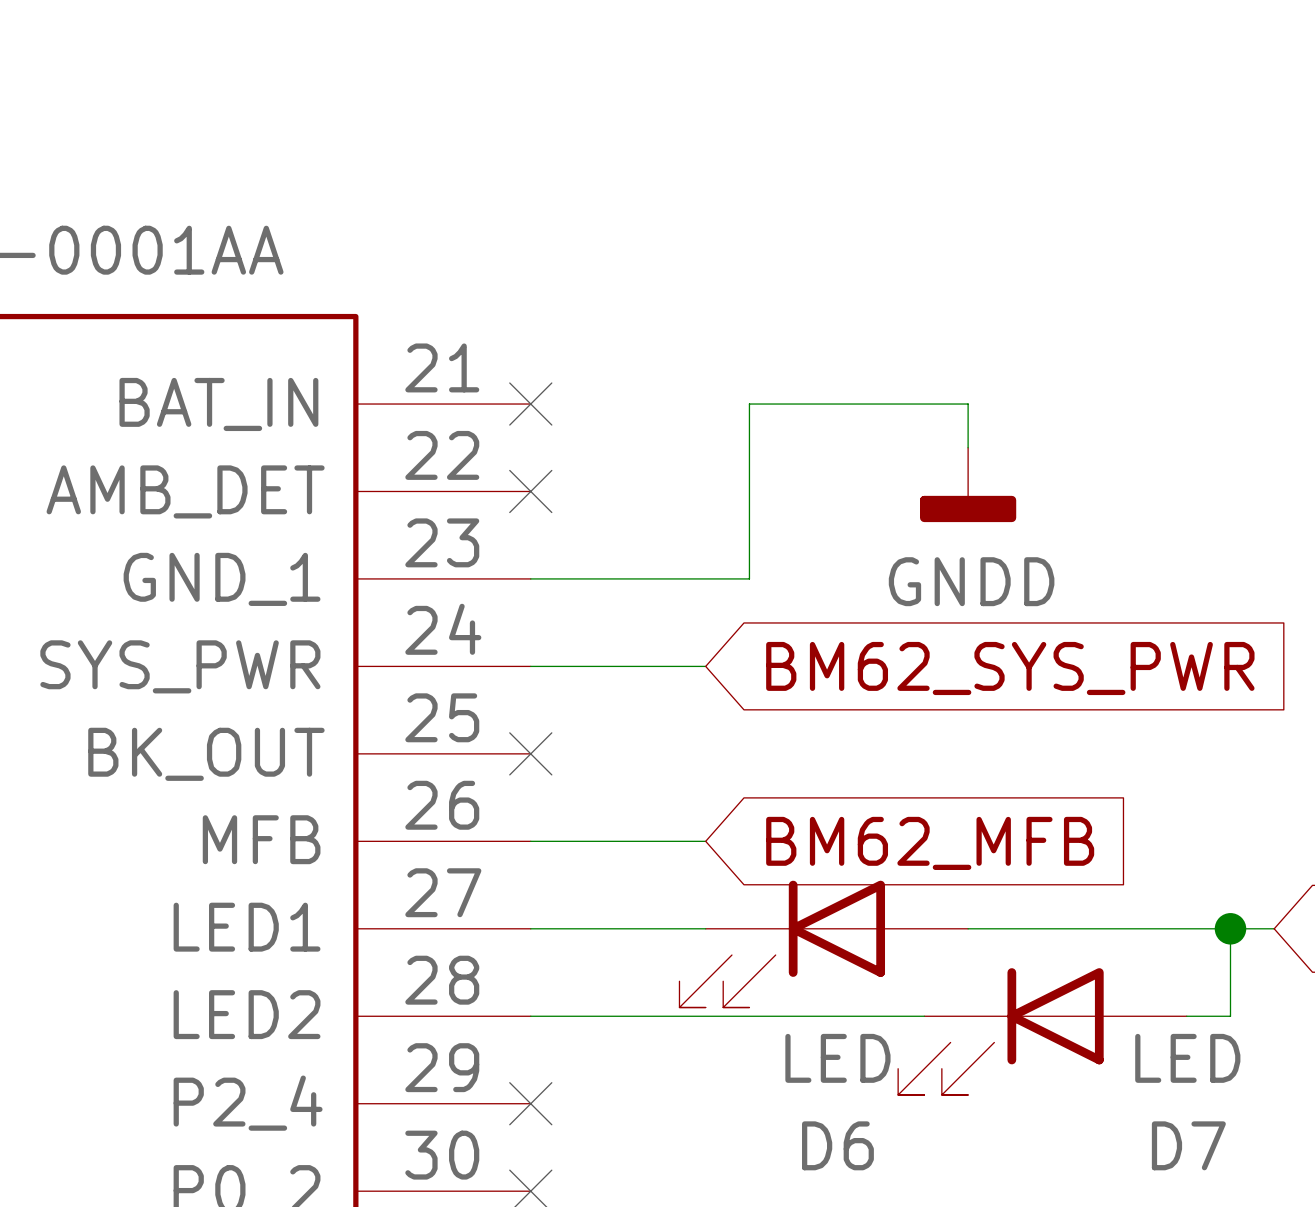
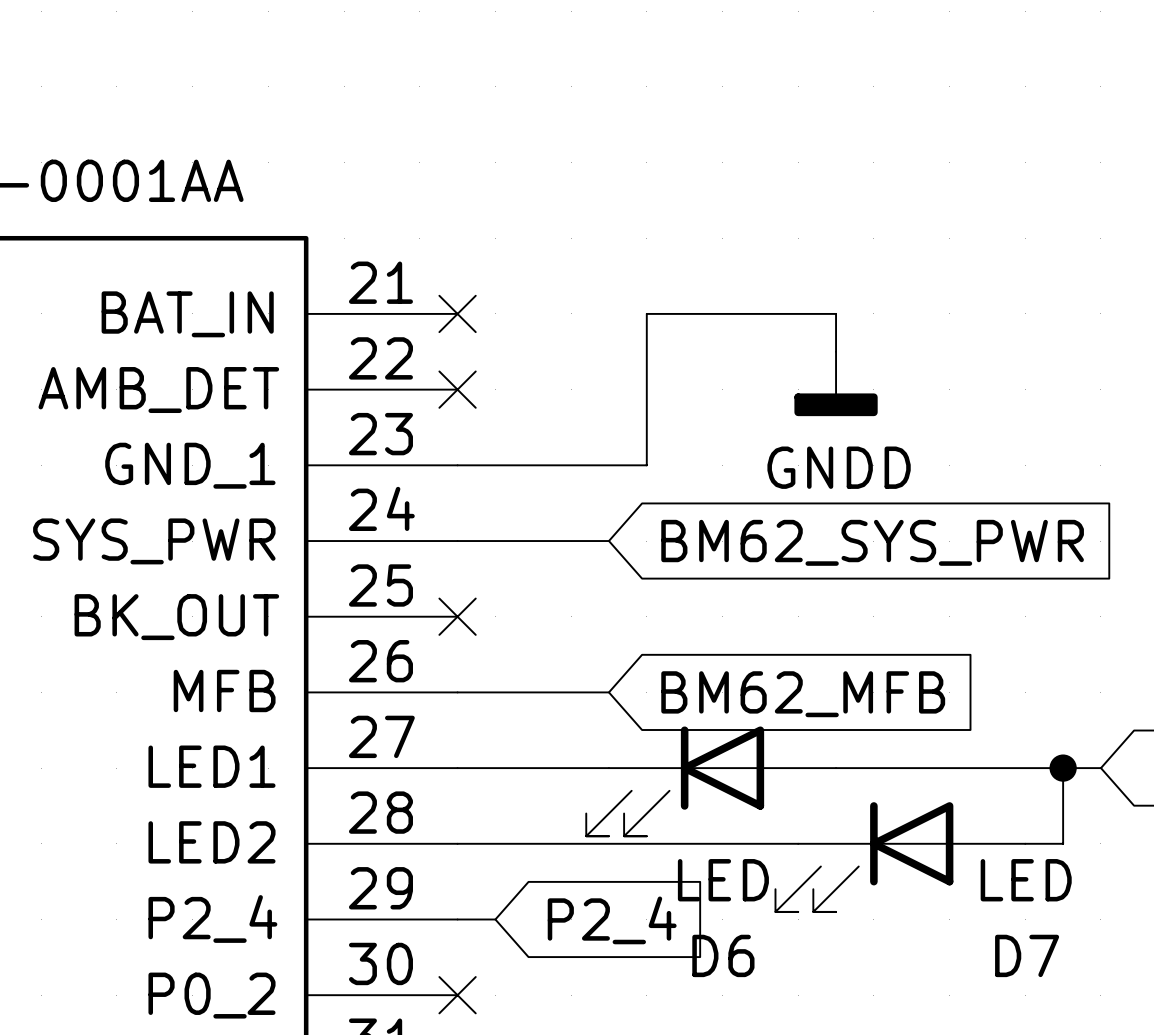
wire: none -> (457, 919) (495, 919)
no-connect mark: (530, 1103) -> none
global label: none -> P2_4 (612, 920)

